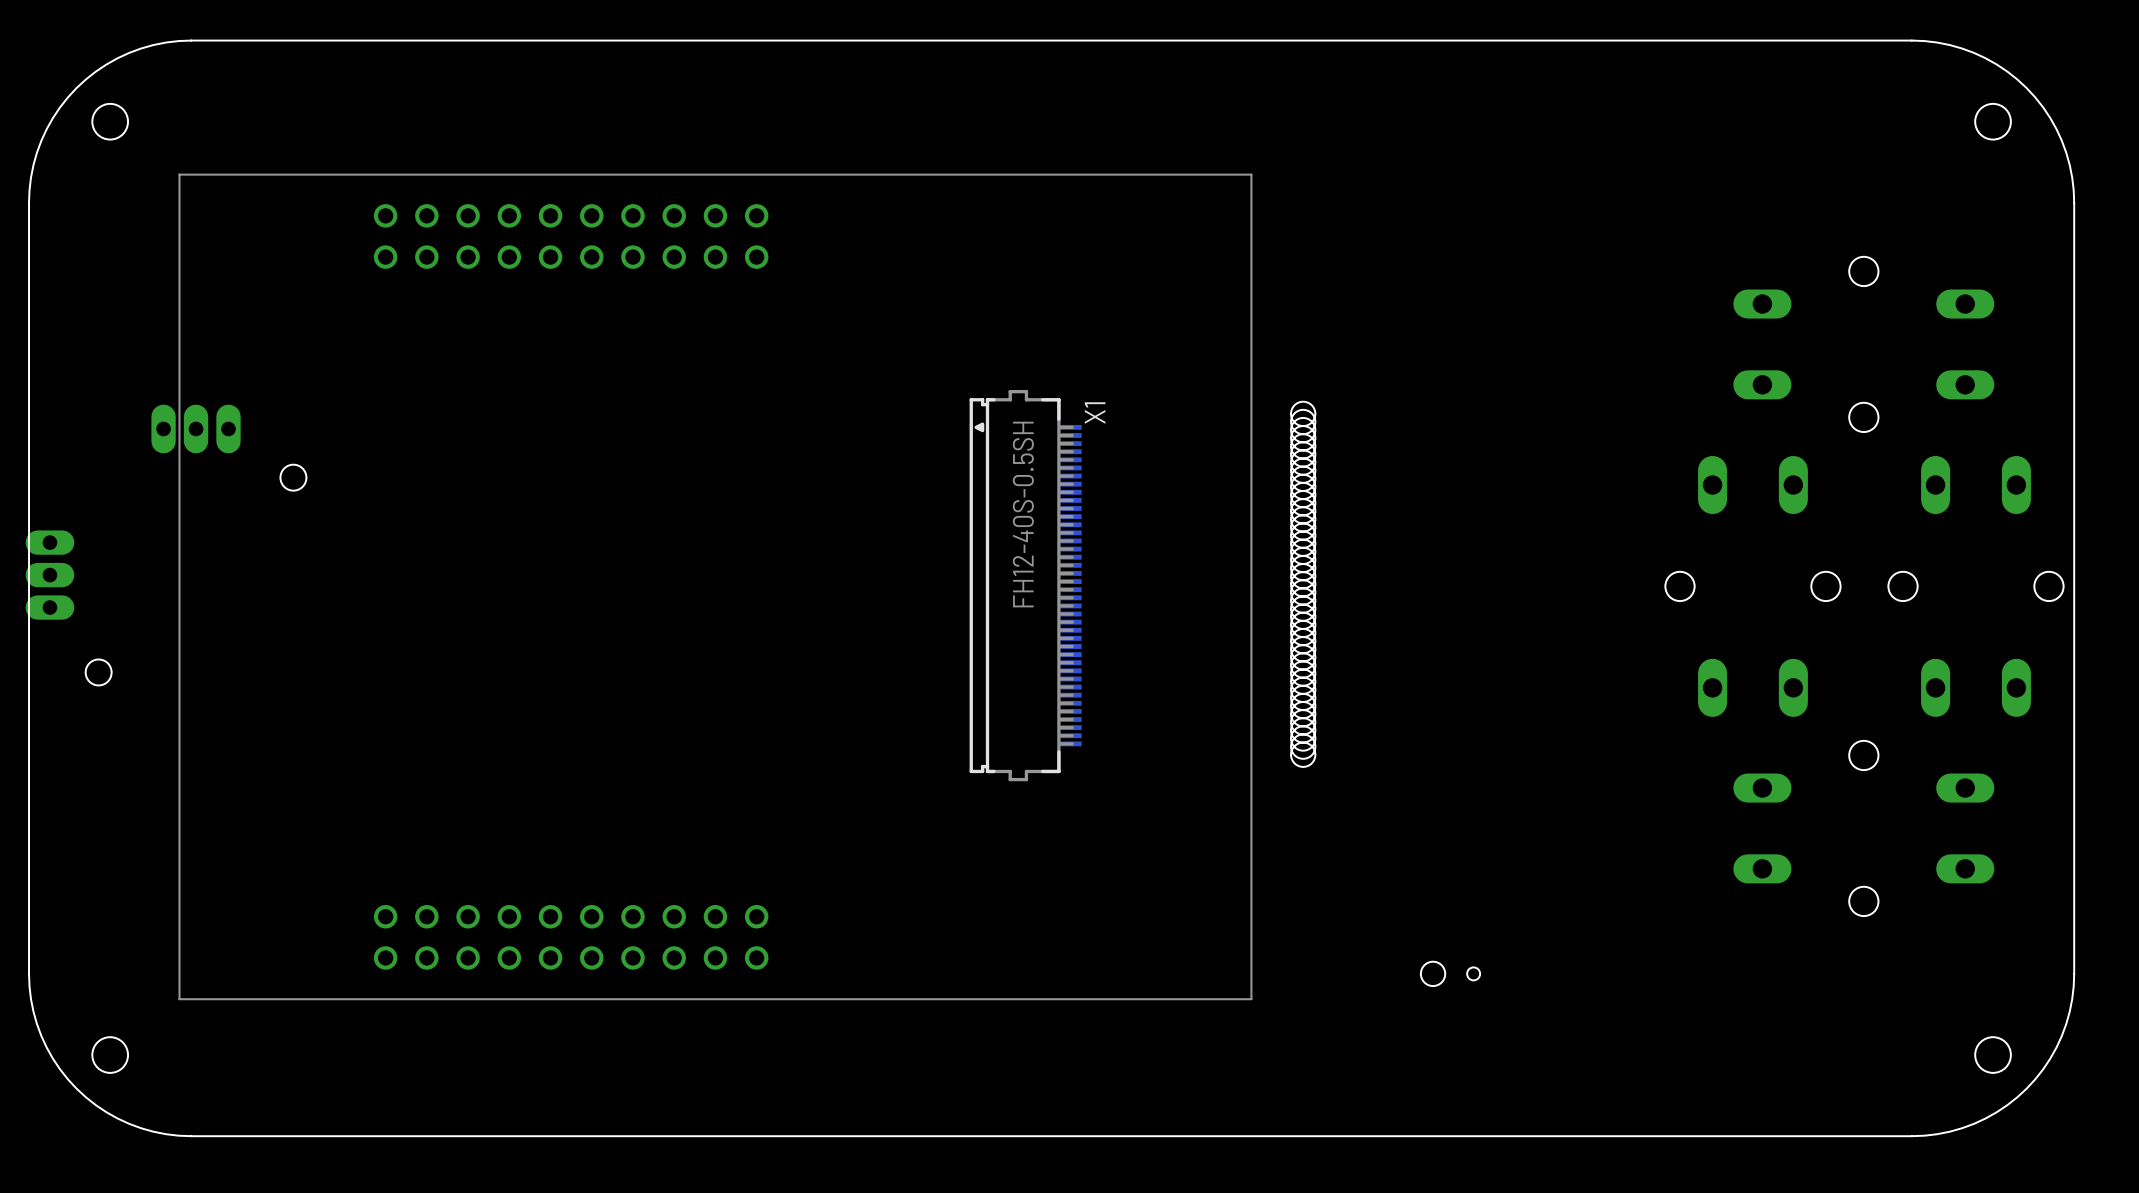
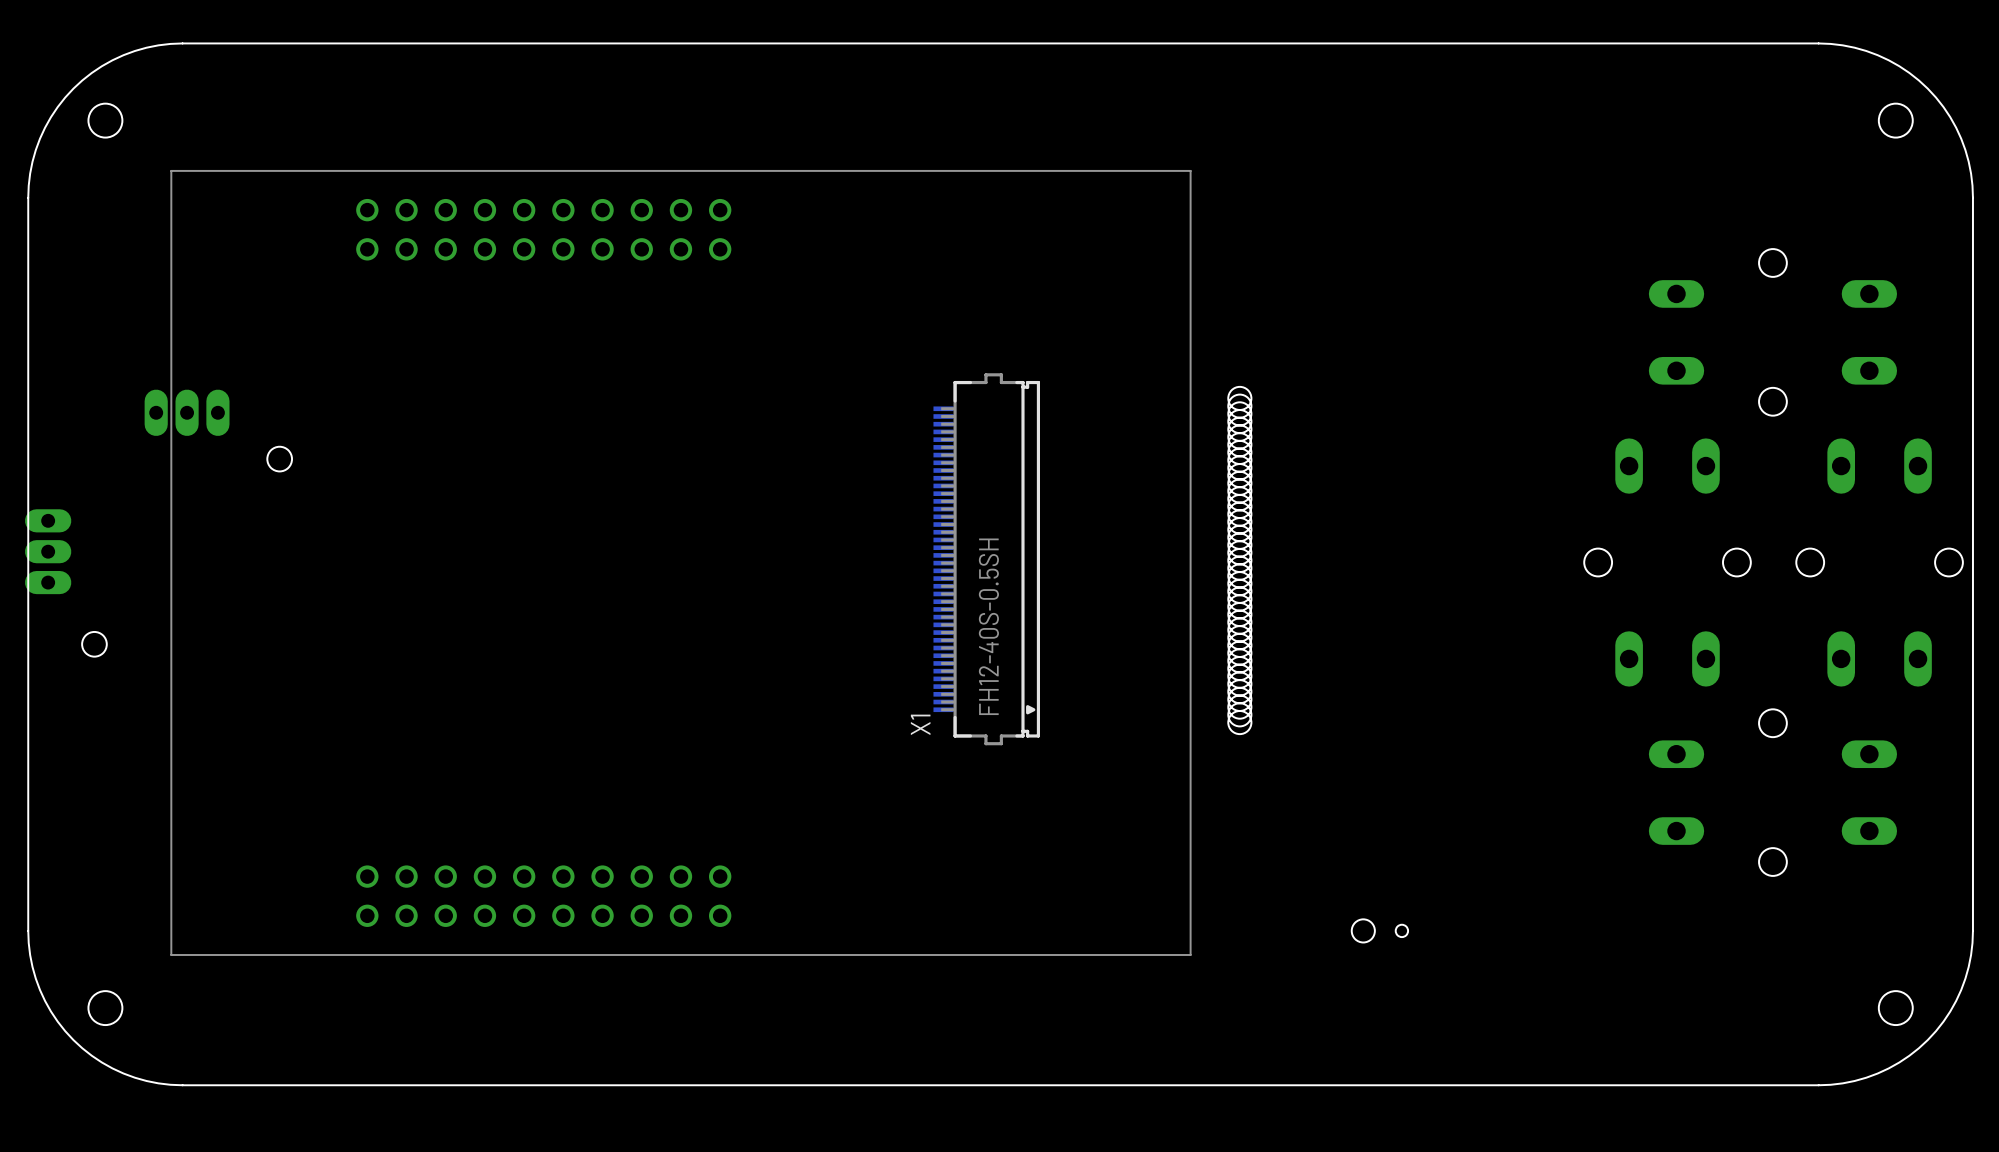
X1 rotation: 0° (1025, 585) -> 180° (986, 559)

